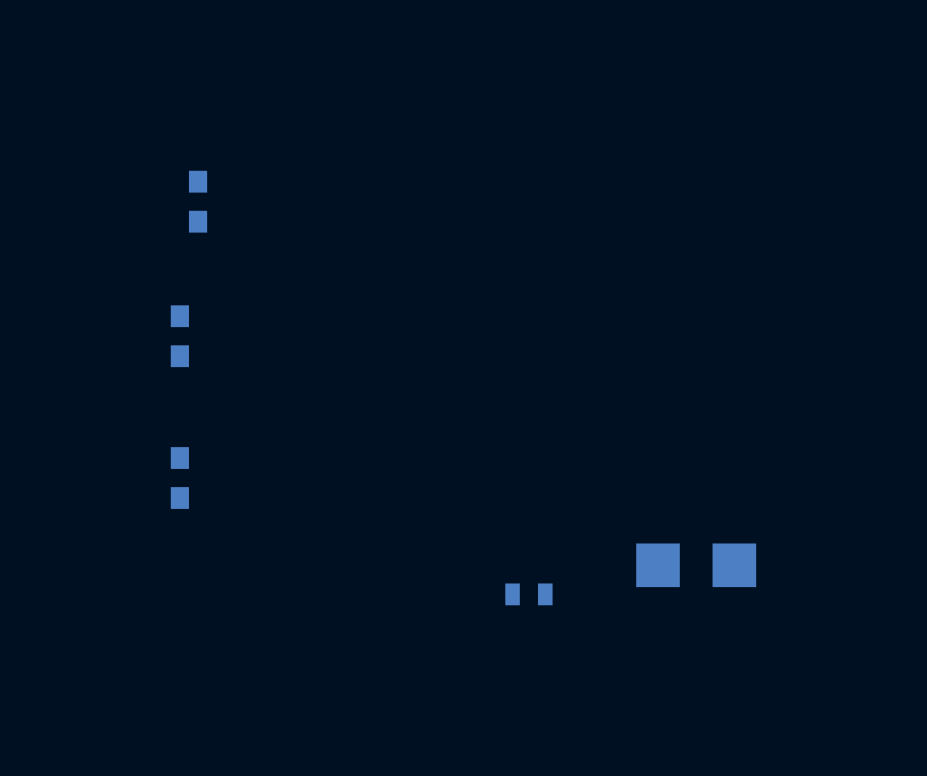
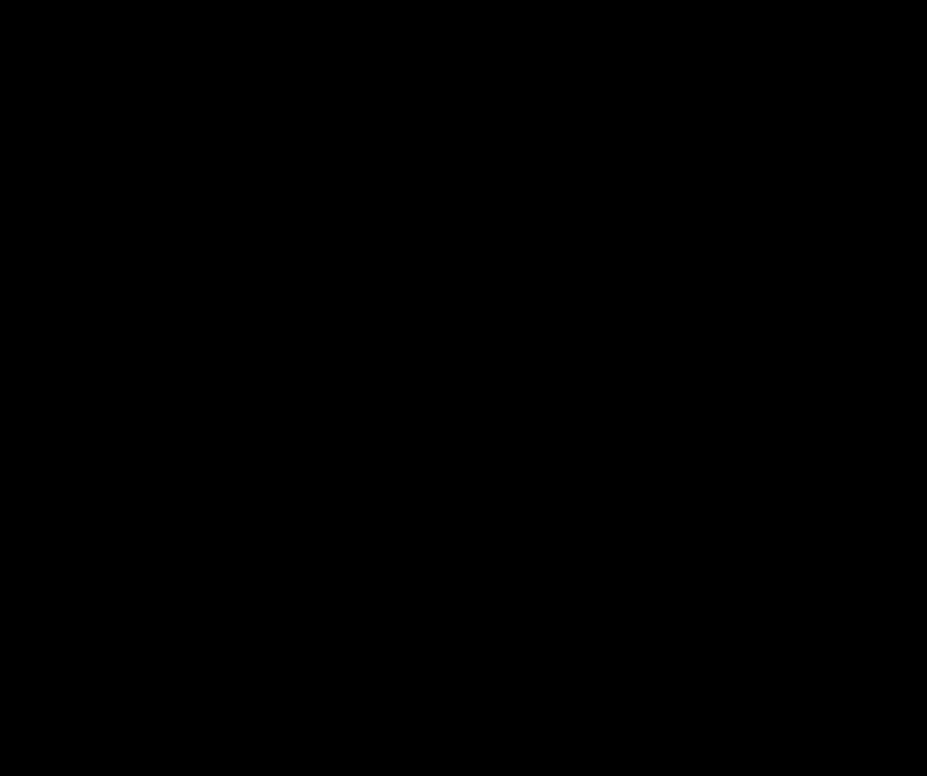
part: (198, 201) -> none
part: (179, 336) -> none
part: (179, 478) -> none
part: (696, 565) -> none
part: (528, 594) -> none

